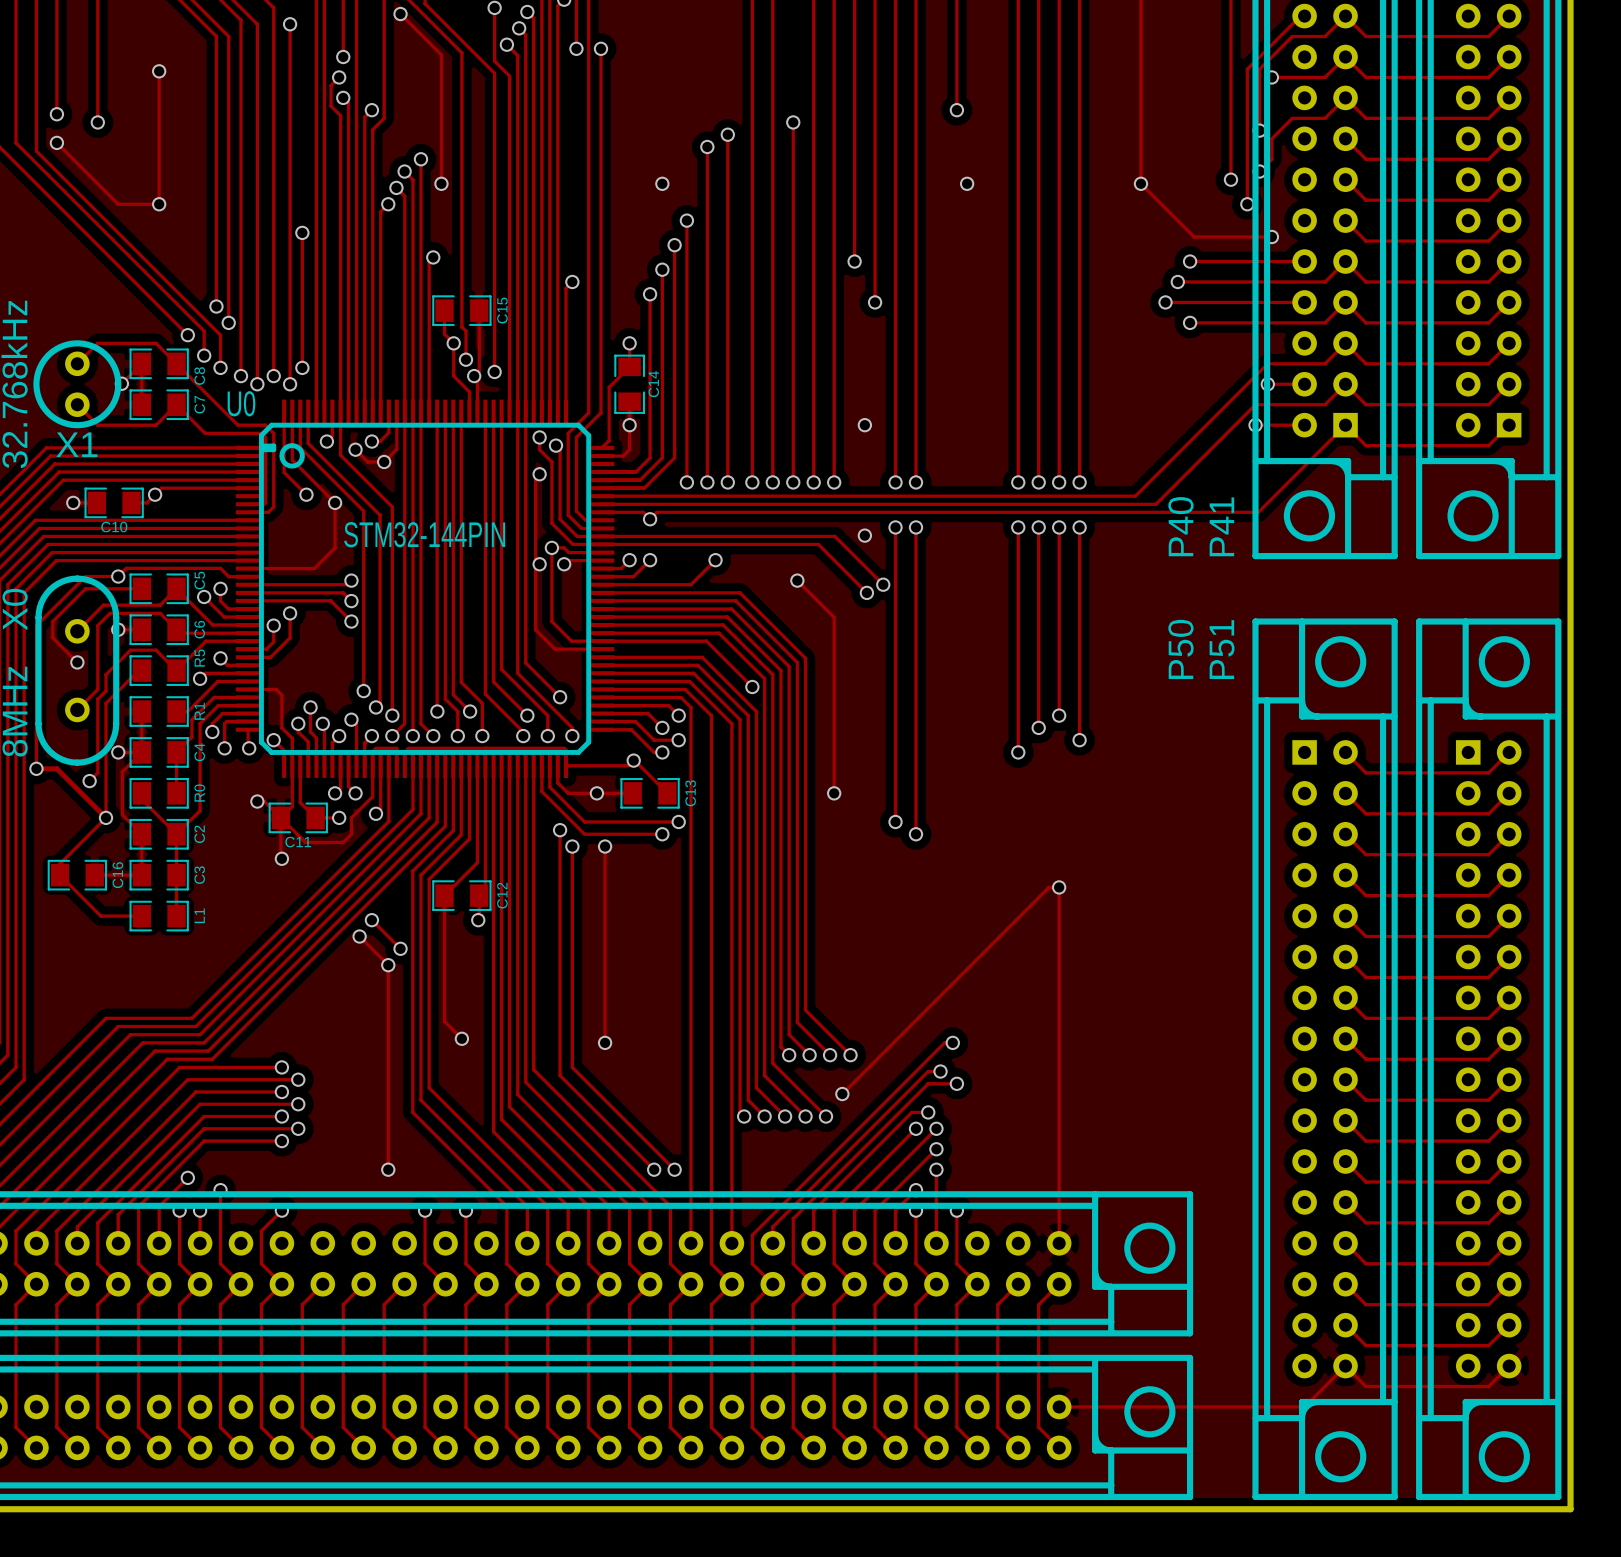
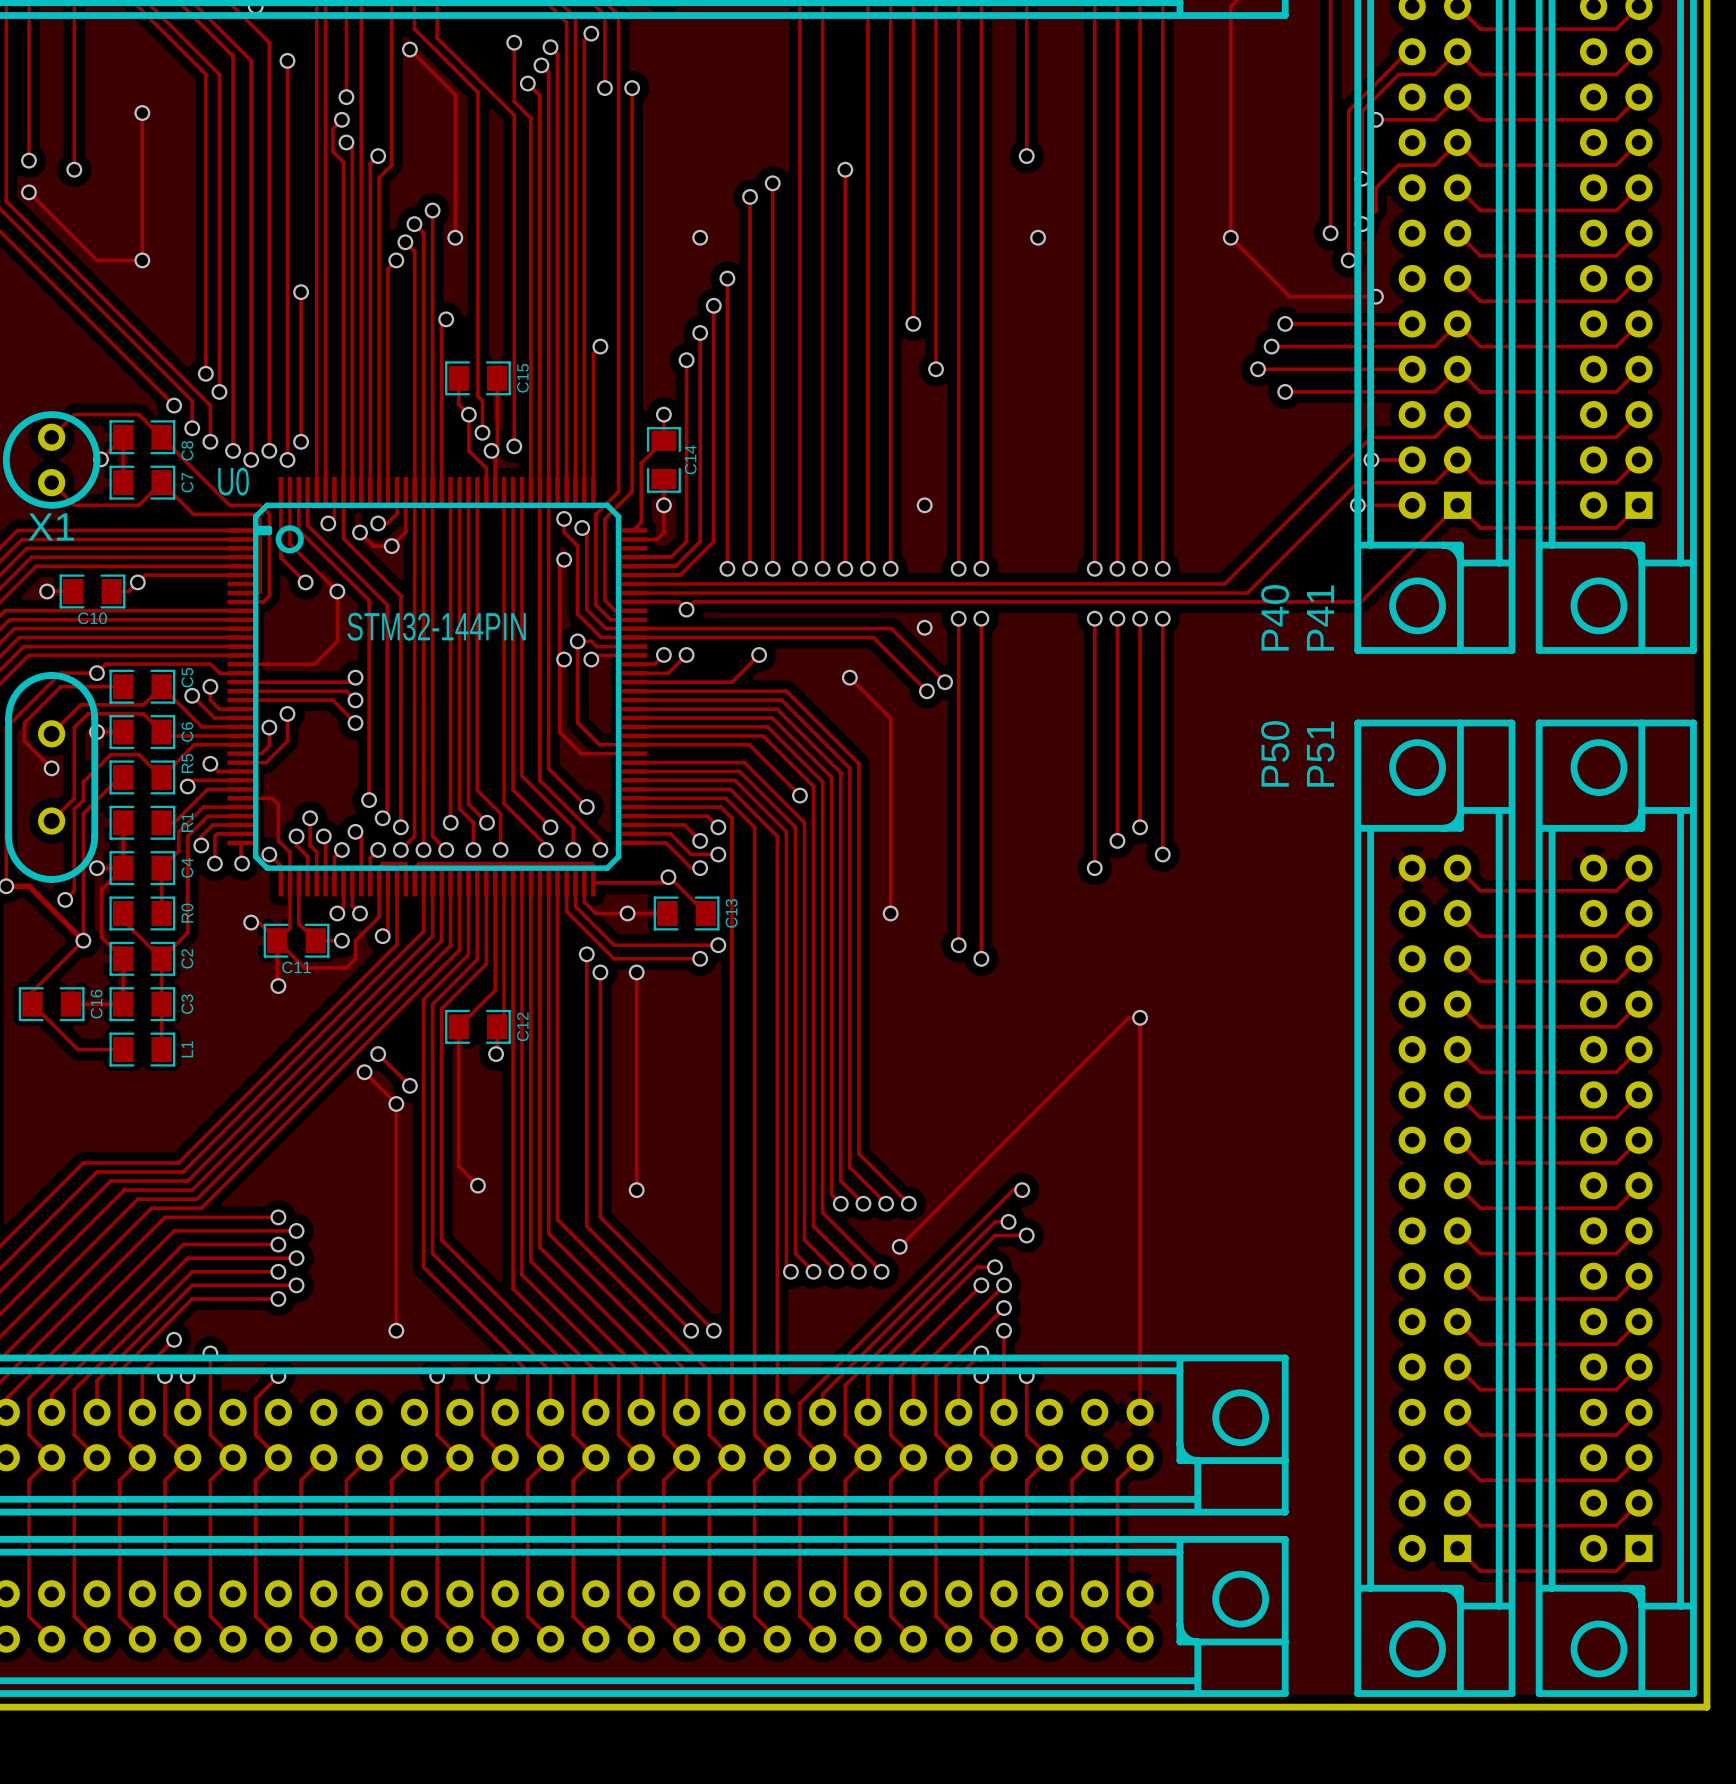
P50 rotation: 0° (1325, 1059) -> 180° (1434, 1208)
P51 rotation: 0° (1488, 1059) -> 180° (1616, 1208)
track: (1345, 1366) (1304, 1406) (1059, 1406) -> none

